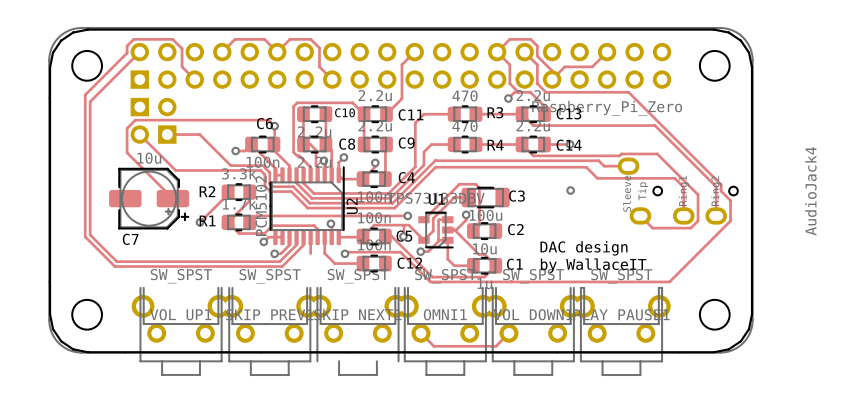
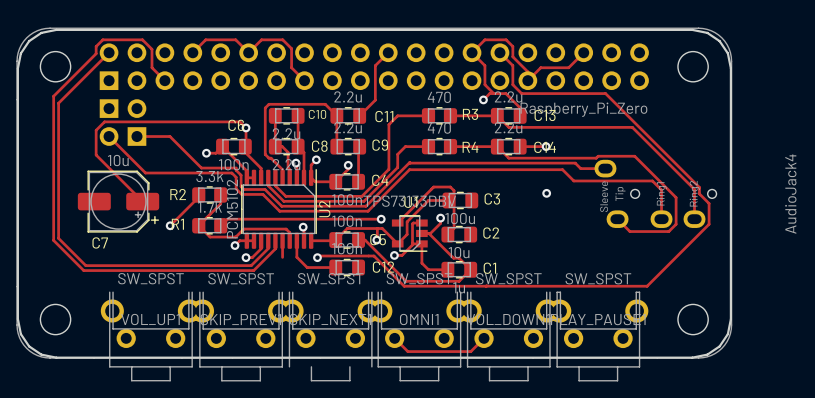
C3 footprint: [461, 187, 510, 209] -> [442, 191, 479, 210]
text: DAC design (583, 248) -> none
text: by WallaceIT (593, 265) -> none

